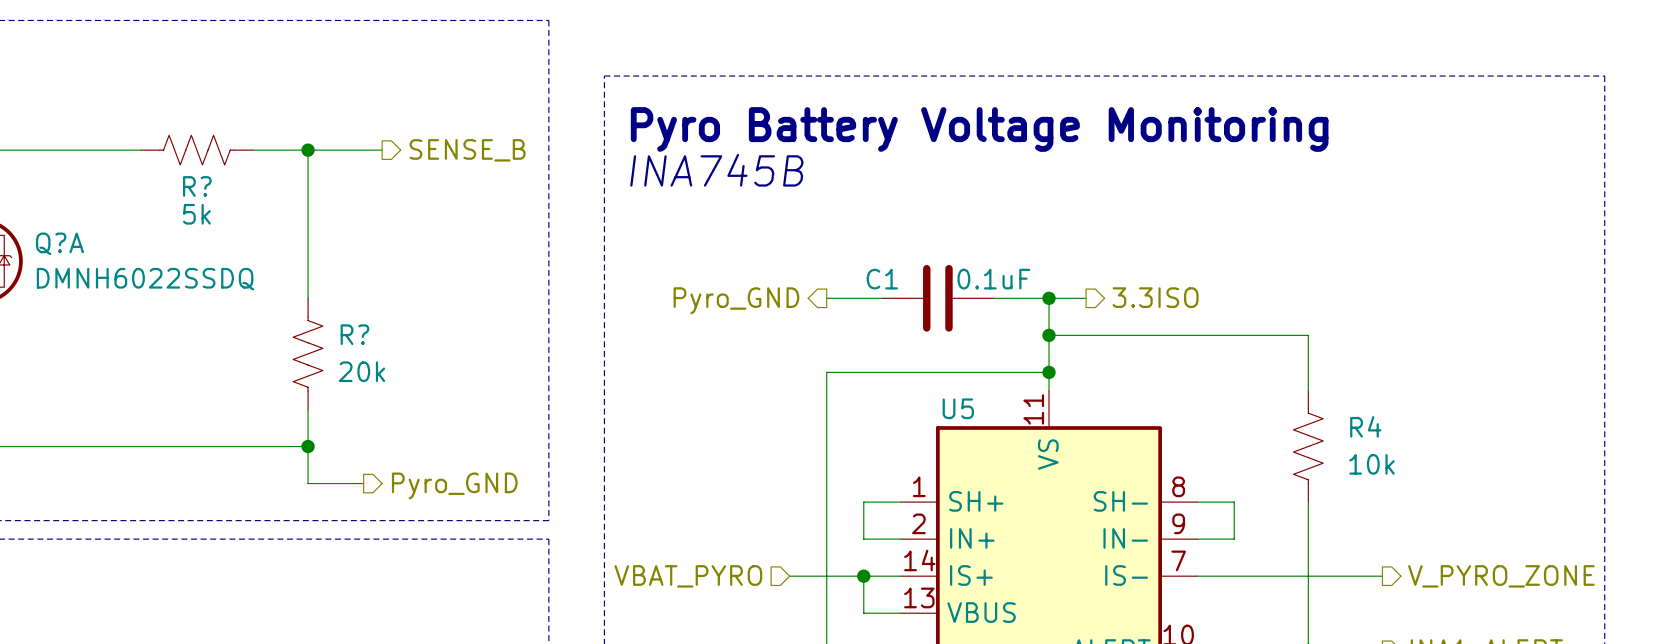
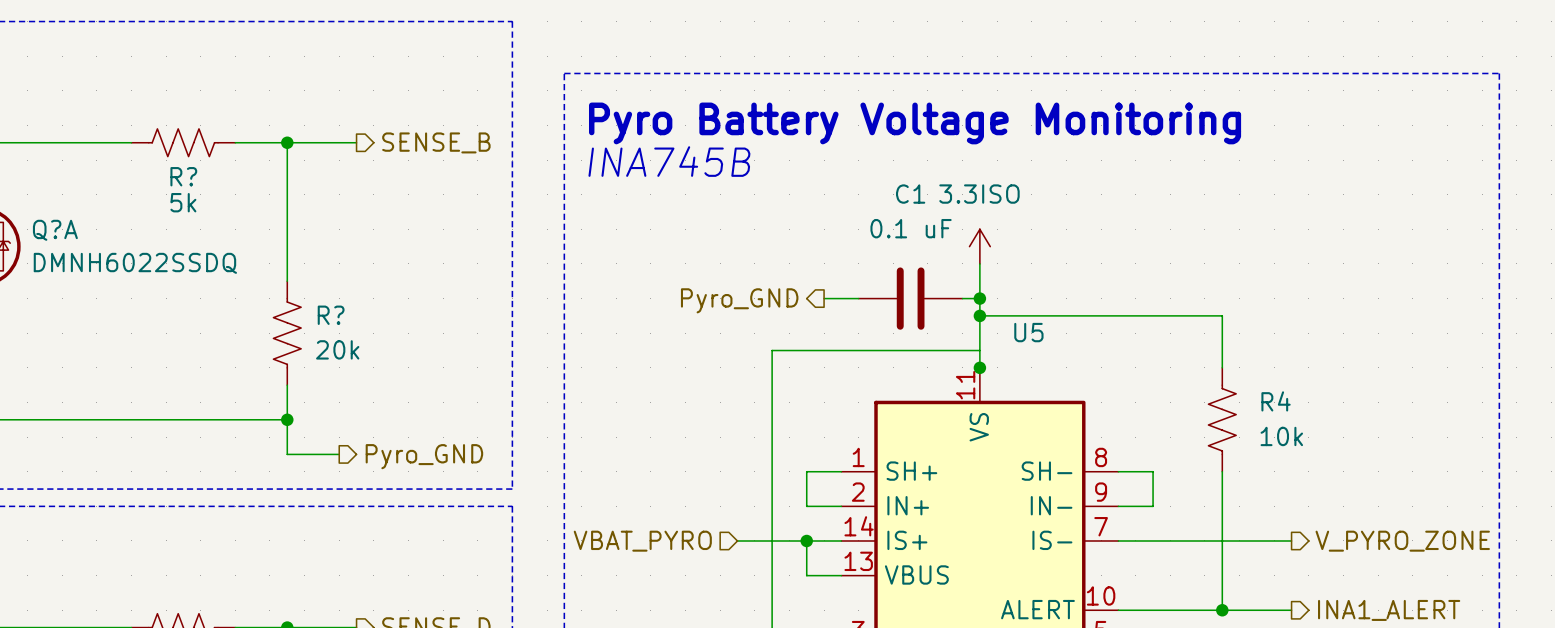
power symbol: none -> 3.3ISO (979, 246)
C1 name position: C1 (882, 279) -> C1 (910, 194)
C1 value: 0.1uF (993, 279) -> 0.1 uF (911, 228)
wire: none -> (979, 263) (979, 281)
hierarchical label: 3.3ISO (1155, 297) -> none
wire: (826, 298) (882, 298) -> none
C1 position: (937, 298) -> (910, 298)
wire: (993, 298) (1086, 298) -> none
junction position: (1049, 298) -> (979, 298)
hierarchical label position: Pyro_GND (736, 300) -> Pyro_GND (739, 300)
wire: none -> (824, 298) (858, 298)
wire: none -> (962, 298) (979, 298)
junction position: (1049, 372) -> (979, 367)
U5 name position: U5 (958, 408) -> U5 (1028, 332)

